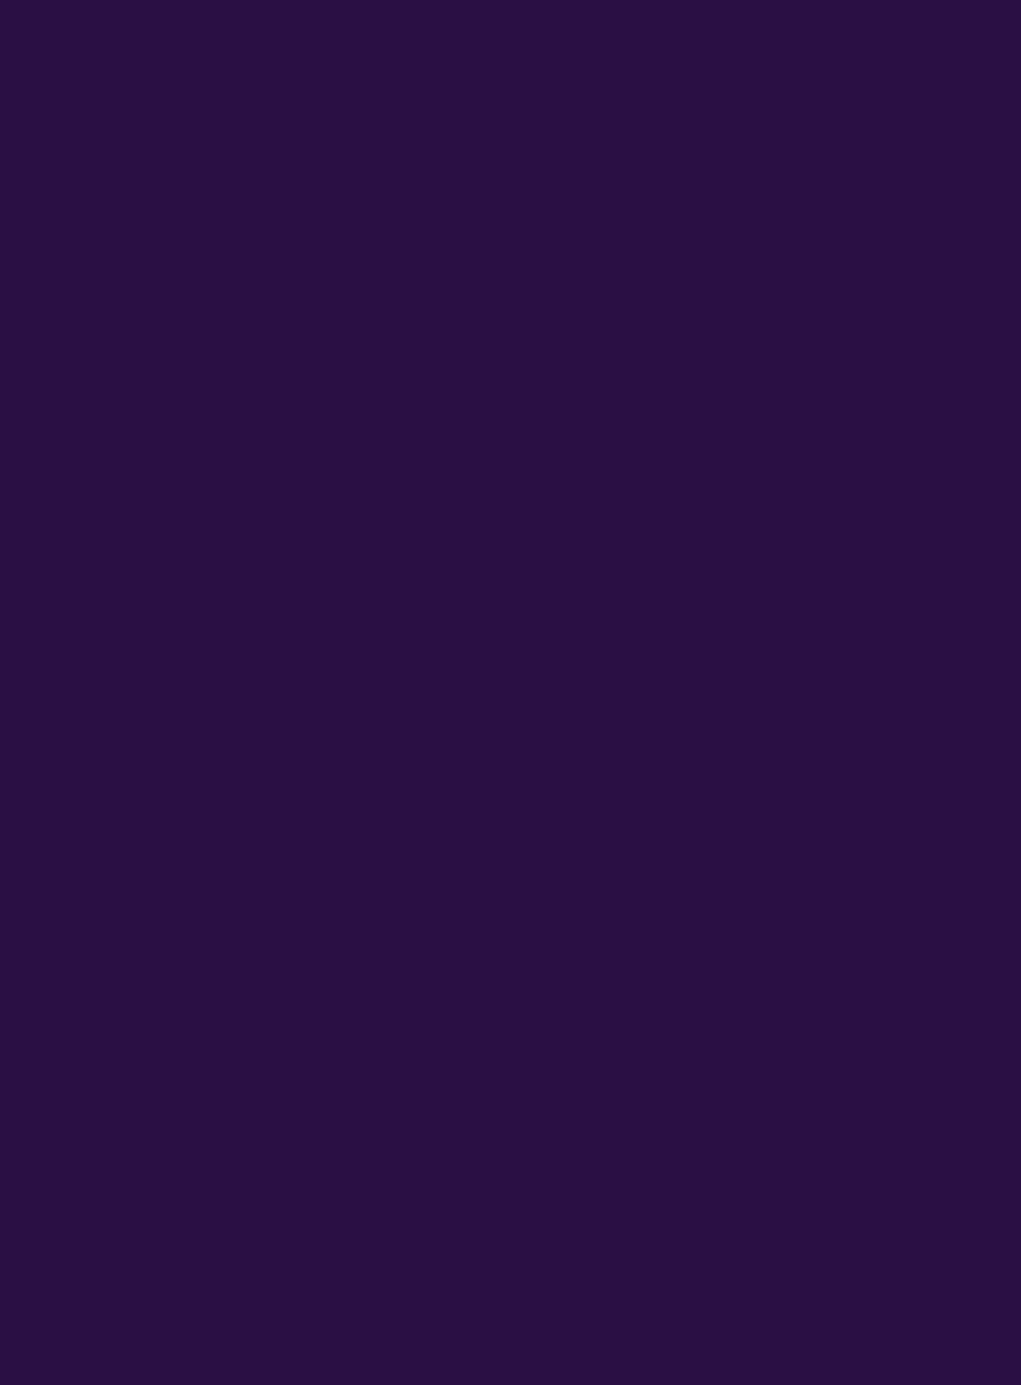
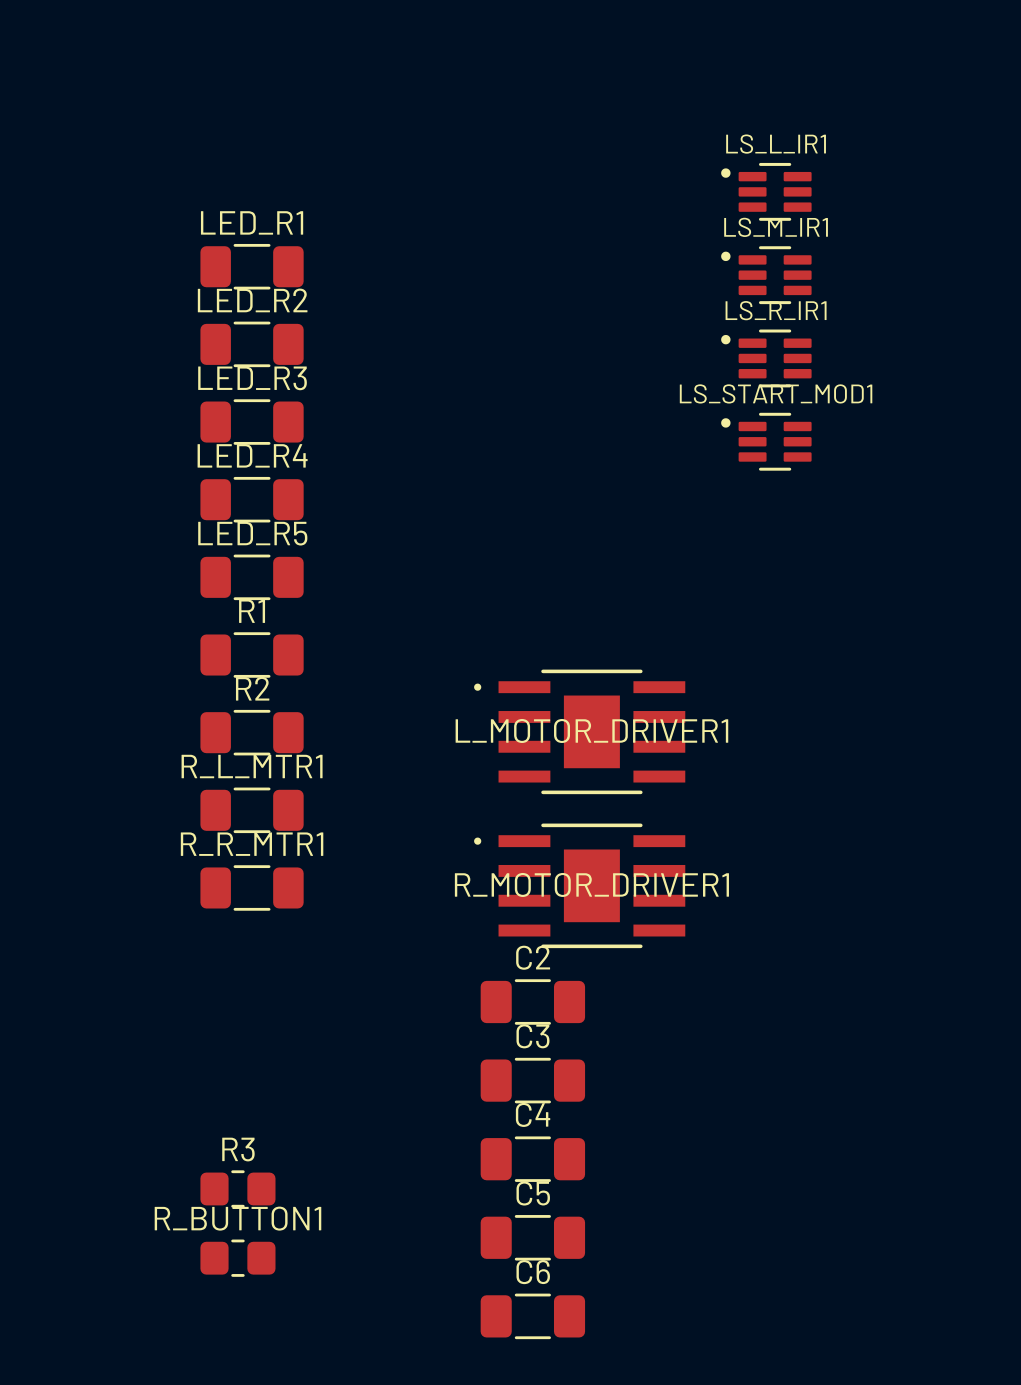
LS_L_IR1: none -> (766, 191)
LED_R1: none -> (252, 266)
LS_M_IR1: none -> (766, 275)
LED_R2: none -> (252, 344)
LS_R_IR1: none -> (766, 358)
LED_R3: none -> (252, 422)
LS_START_MOD1: none -> (766, 441)
LED_R4: none -> (252, 499)
LED_R5: none -> (252, 577)
R1: none -> (252, 655)
L_MOTOR_DRIVER1: none -> (579, 731)
R2: none -> (252, 732)
R_L_MTR1: none -> (252, 810)
R_MOTOR_DRIVER1: none -> (579, 885)
R_R_MTR1: none -> (252, 887)
C2: none -> (532, 1002)
C3: none -> (532, 1080)
C4: none -> (532, 1159)
R3: none -> (237, 1188)
C5: none -> (532, 1237)
R_BUTTON1: none -> (237, 1258)
C6: none -> (532, 1316)

